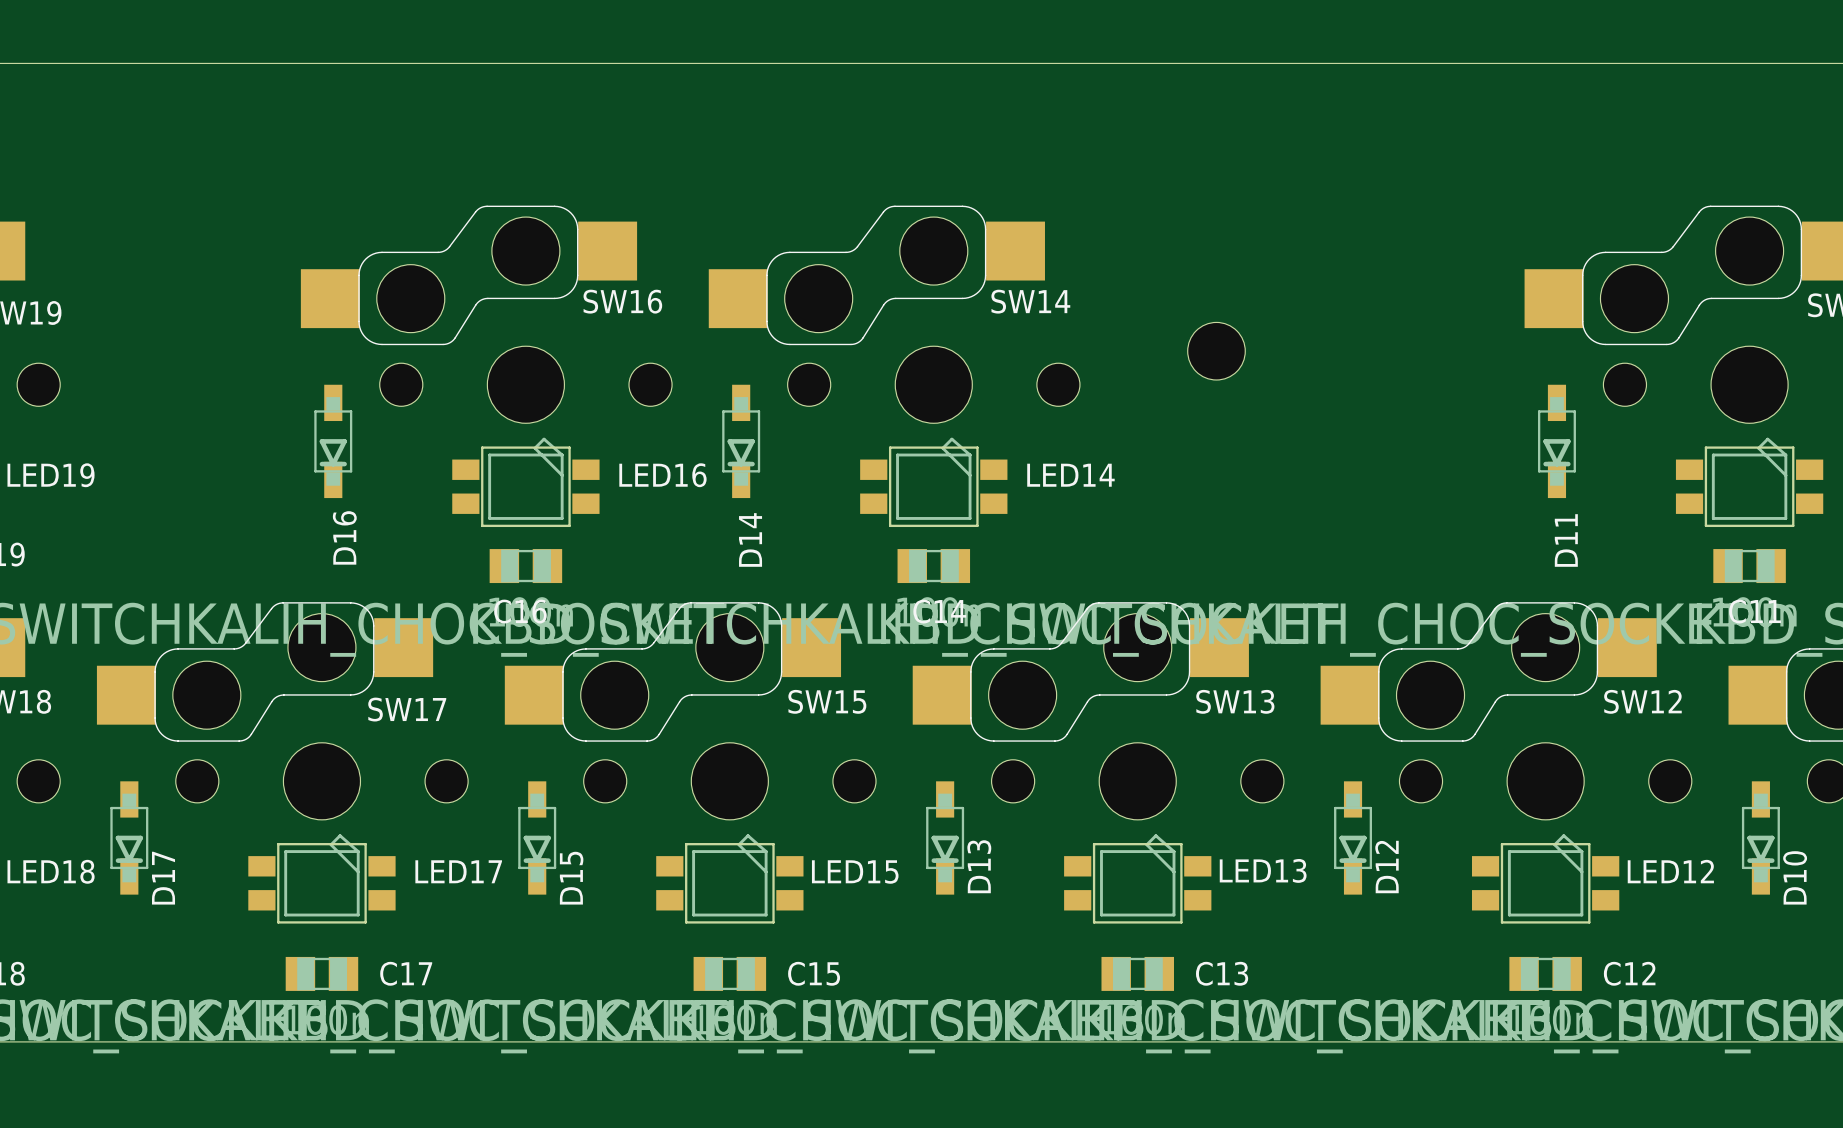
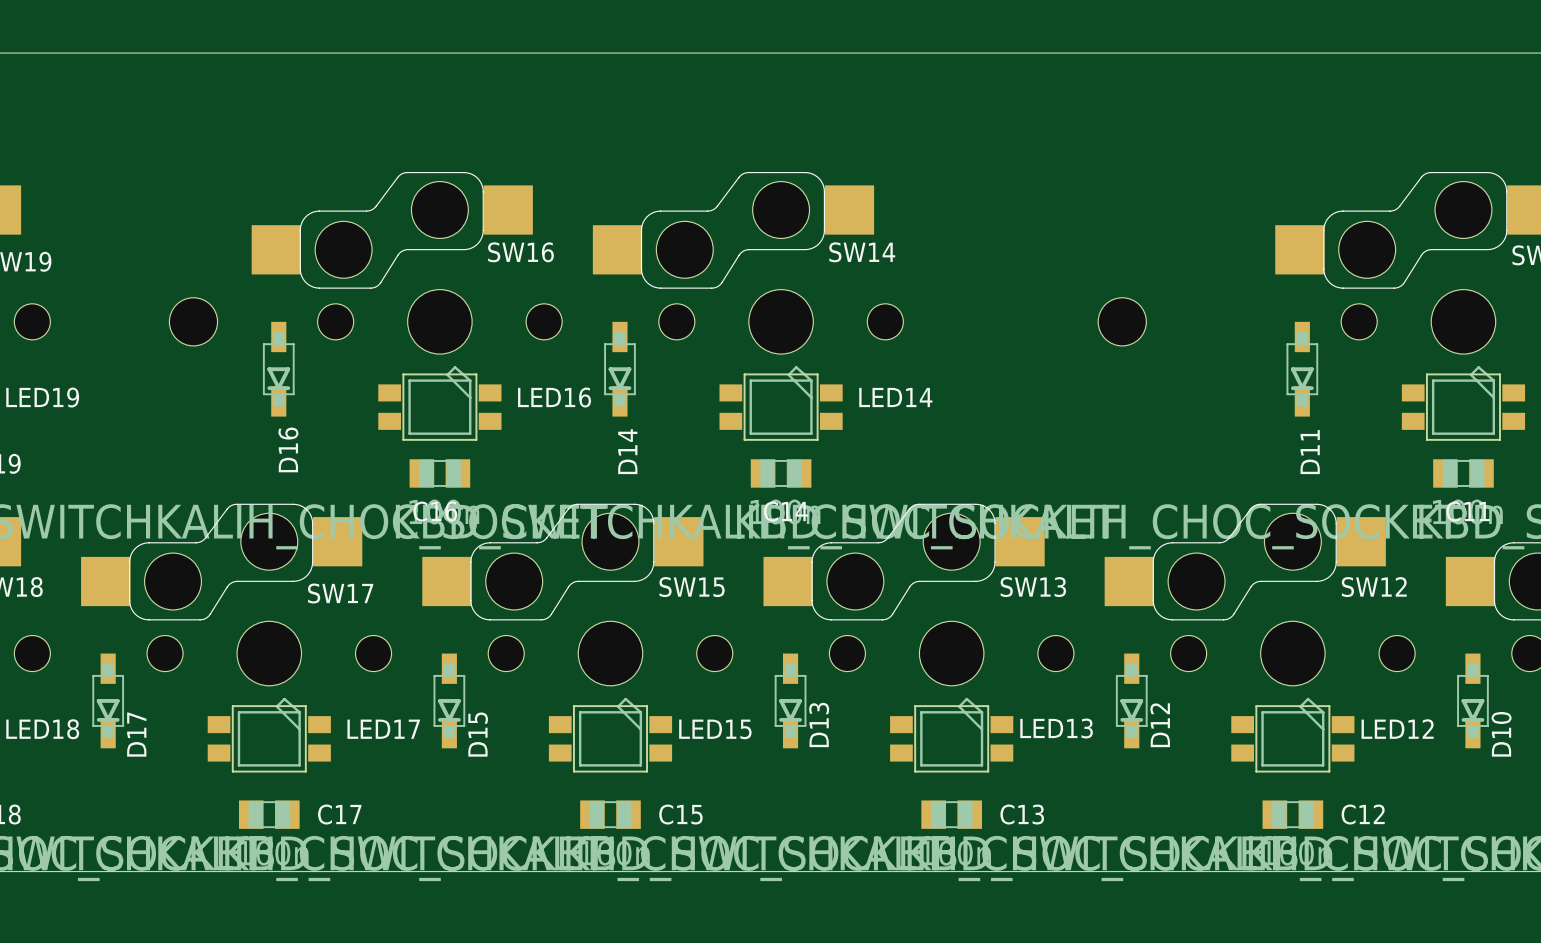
hole position: (1216, 351) -> (1122, 321)
hole: none -> (193, 321)

